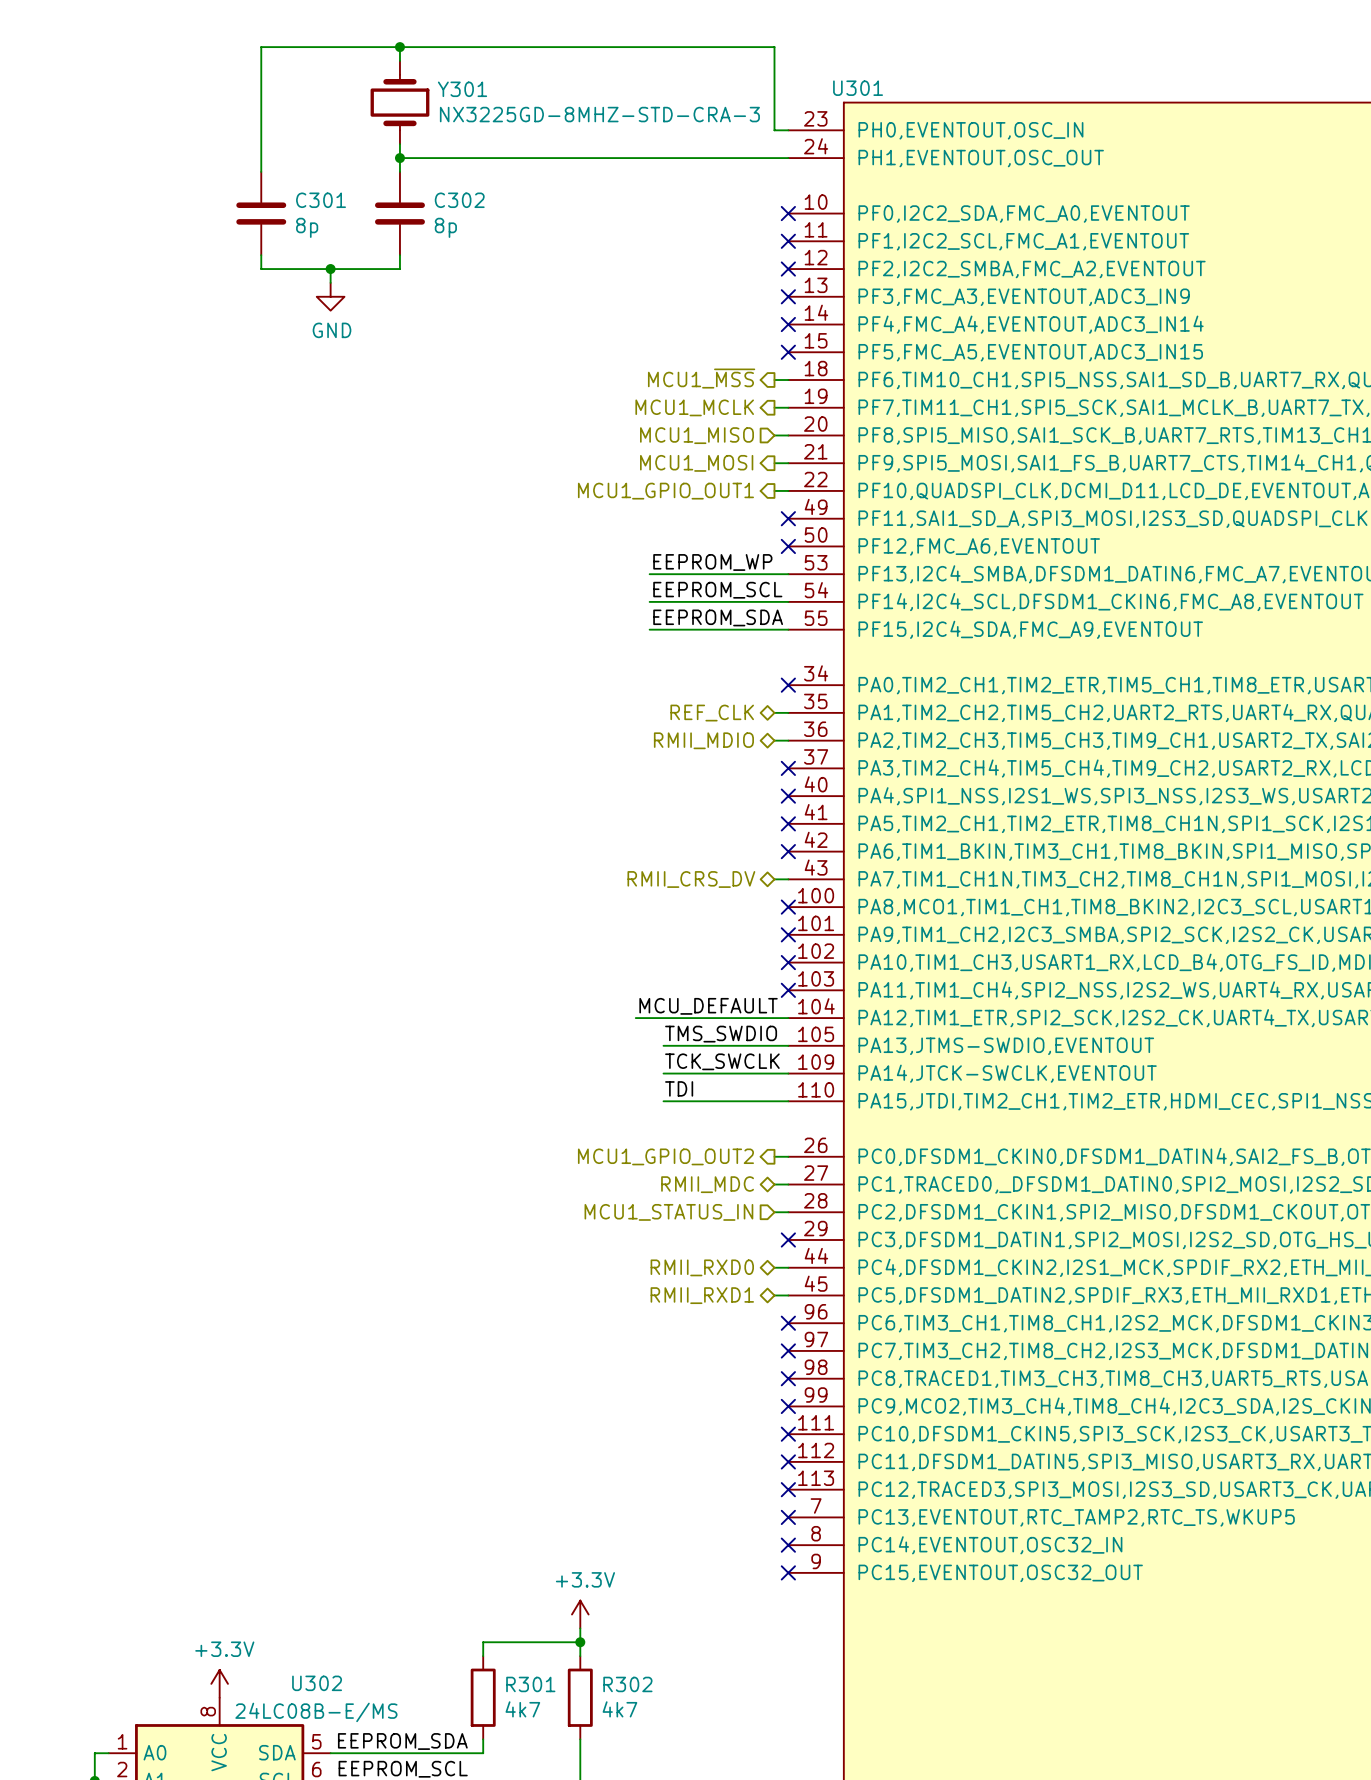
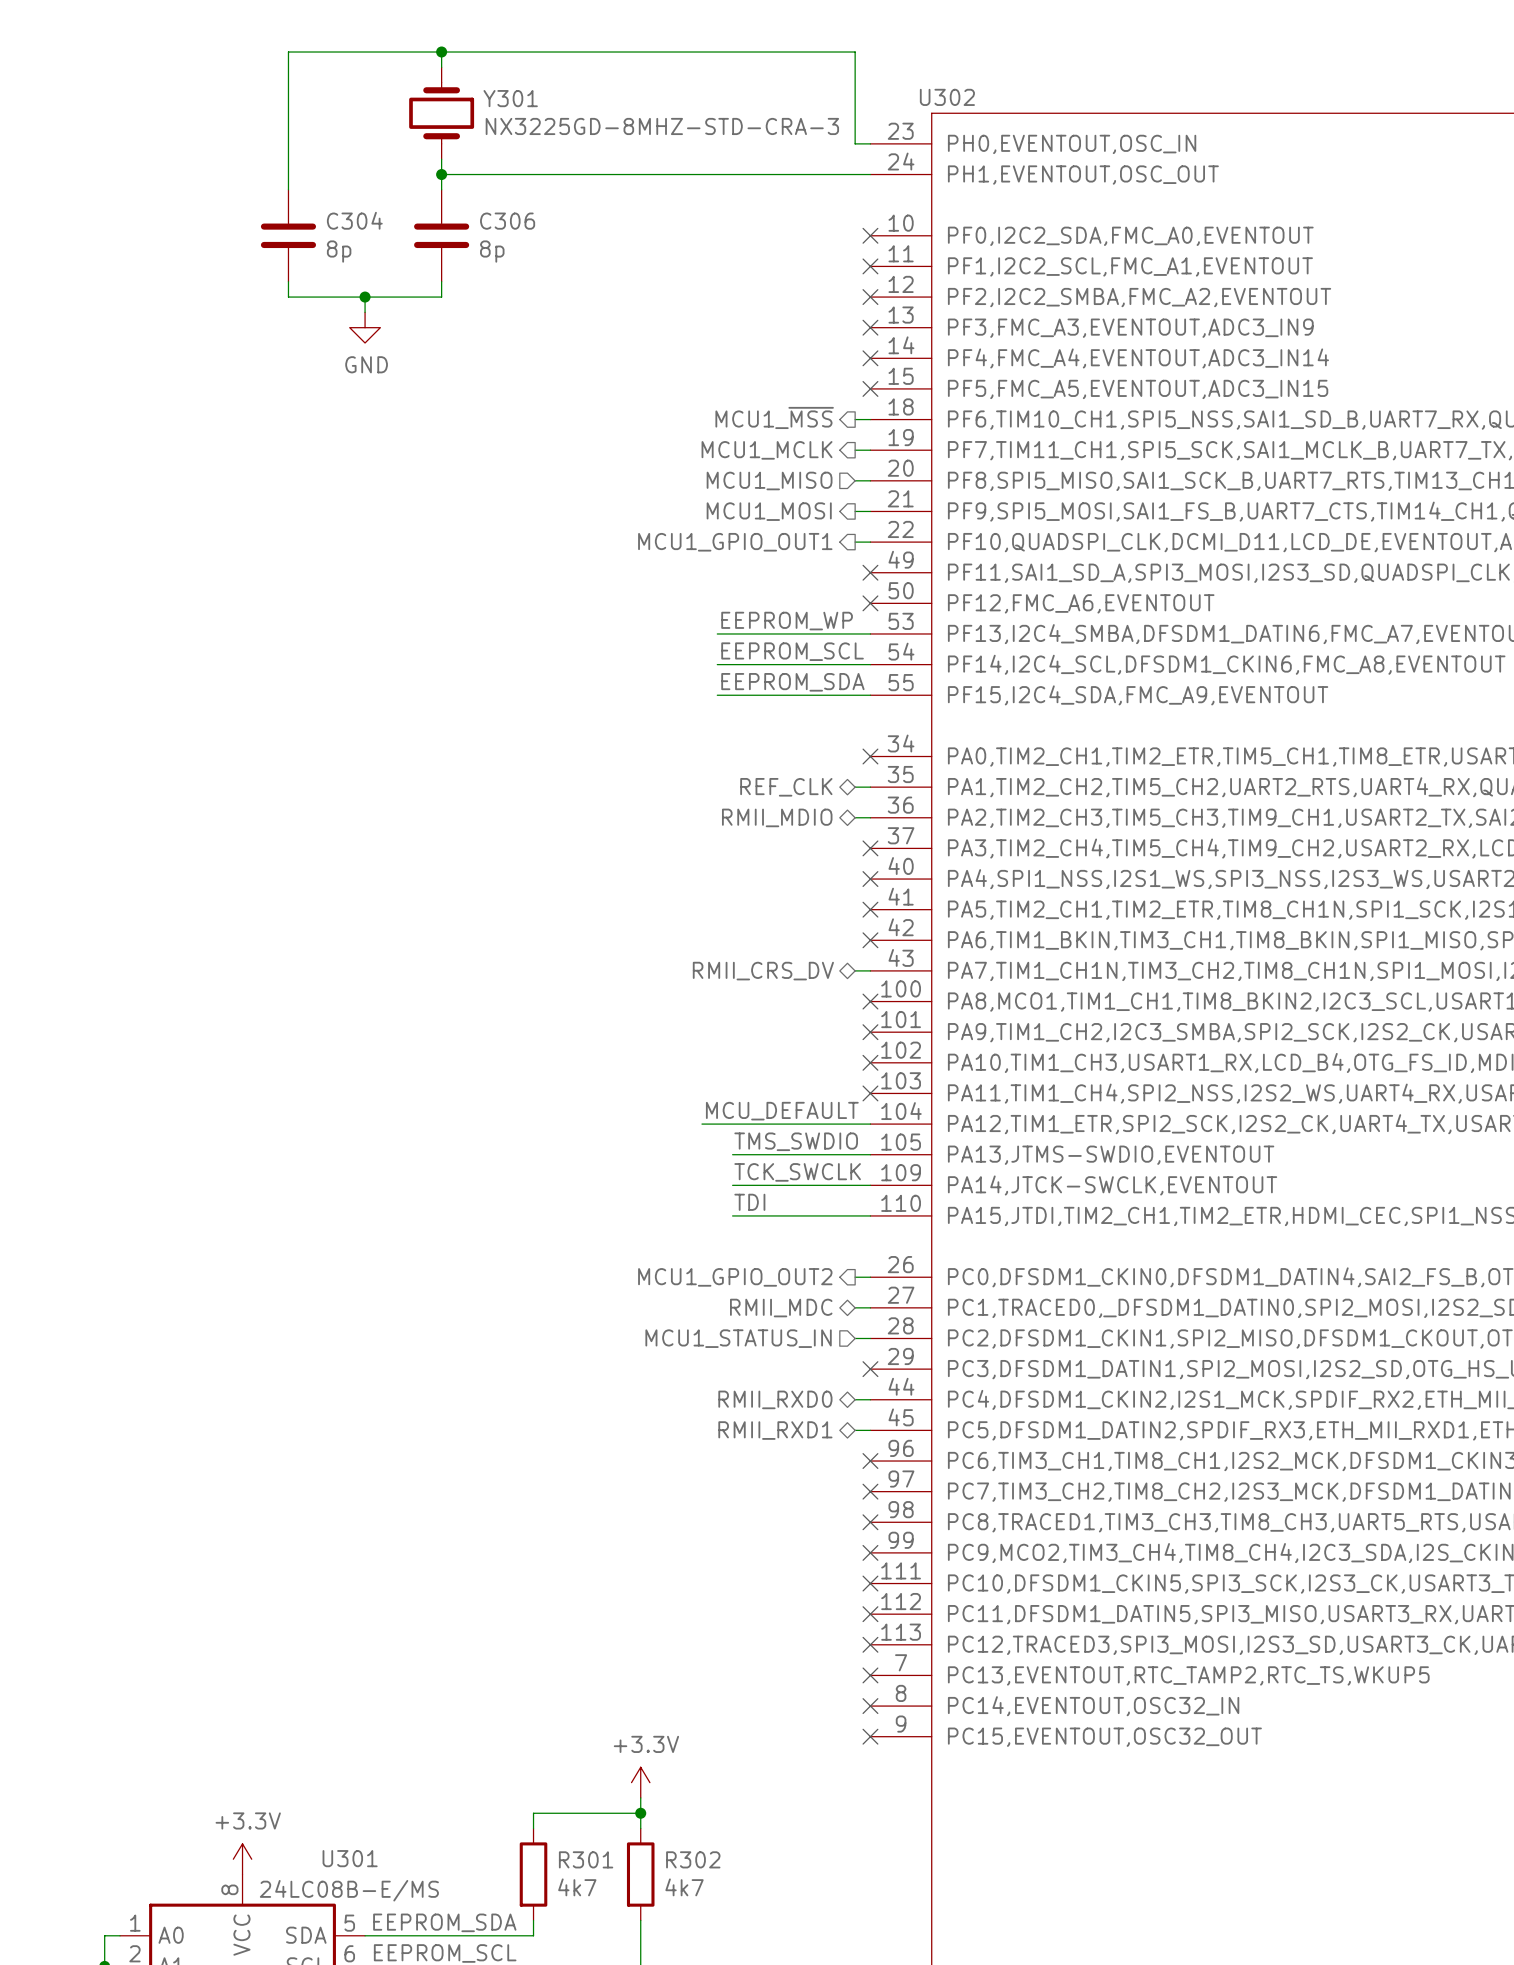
U301 name: U301 (858, 88) -> U302 (947, 97)
C301 name: C301 (321, 200) -> C304 (354, 220)
C302 name: C302 (459, 200) -> C306 (507, 221)
U302 name: U302 (317, 1683) -> U301 (350, 1858)

